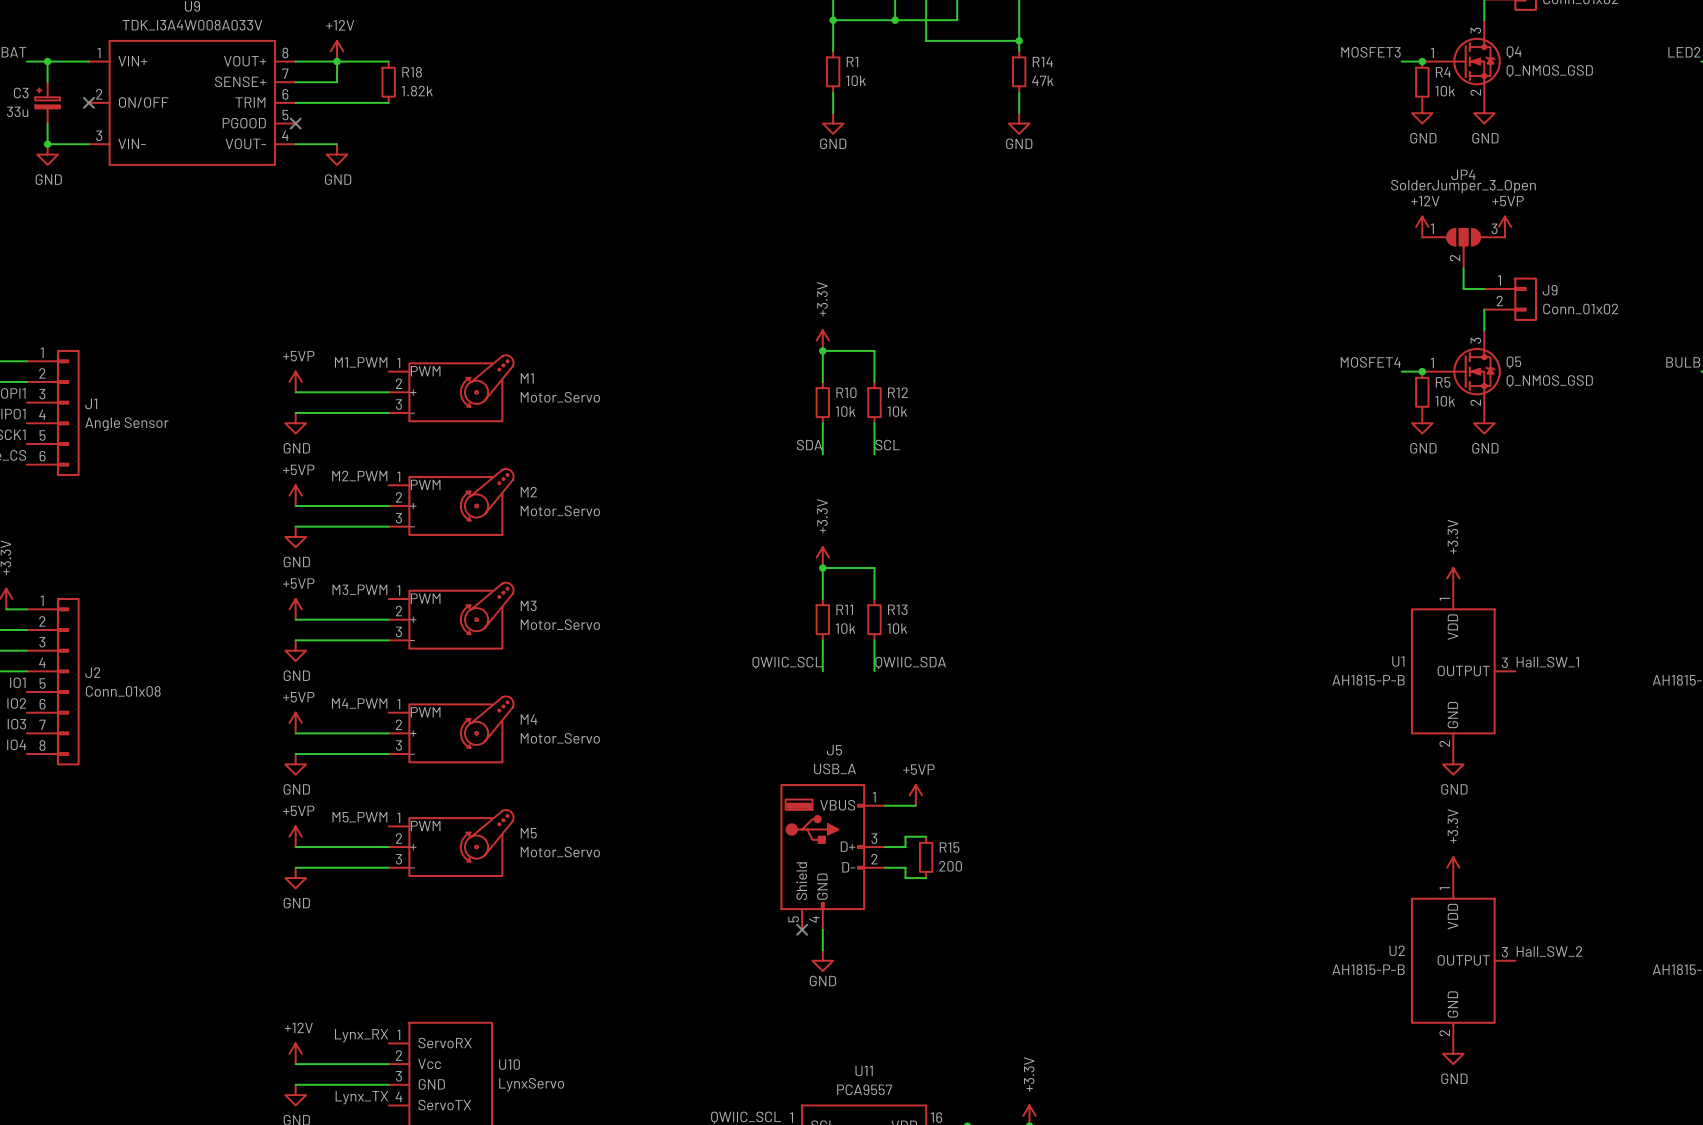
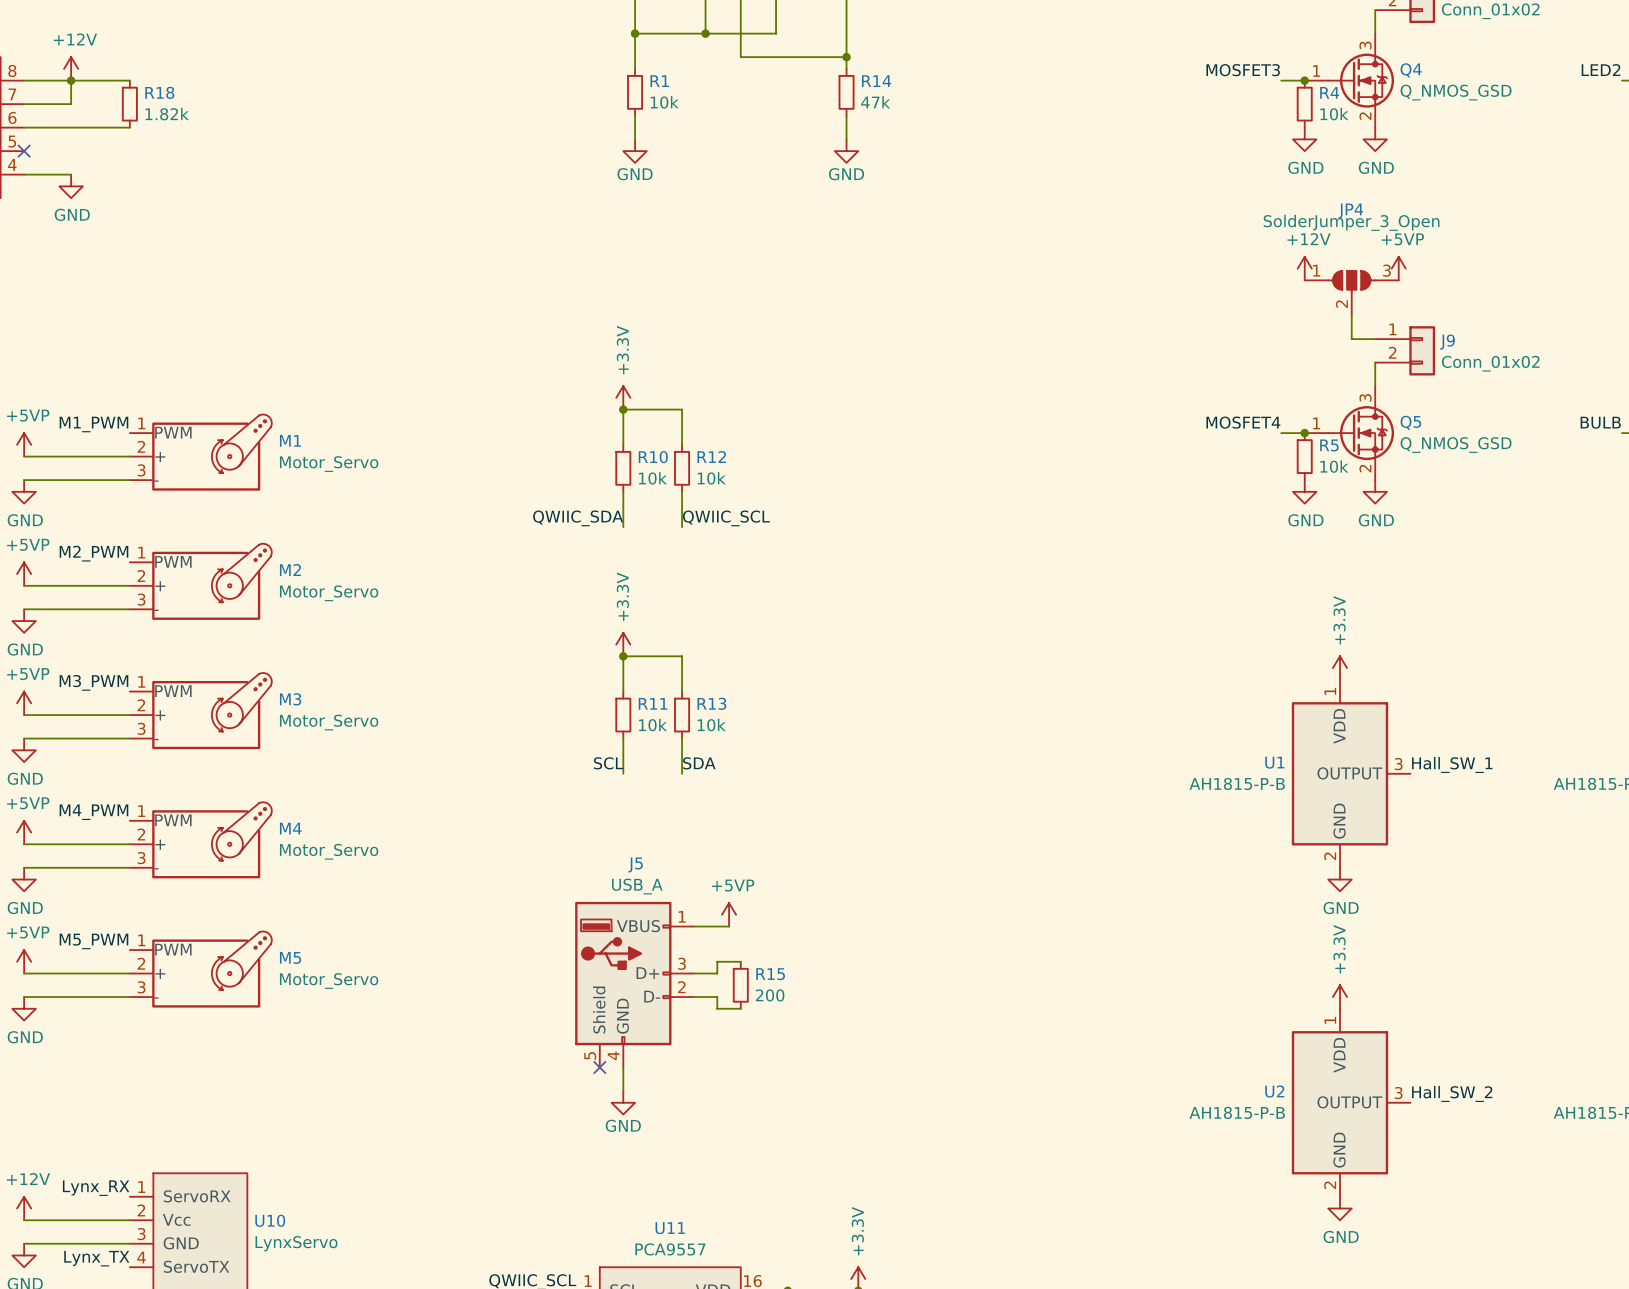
label: SDA (809, 445) -> QWIIC_SDA (578, 518)
label: SCL (887, 445) -> QWIIC_SCL (726, 518)
label: QWIIC_SCL (787, 662) -> SCL (608, 763)
label: QWIIC_SDA (910, 662) -> SDA (699, 763)

